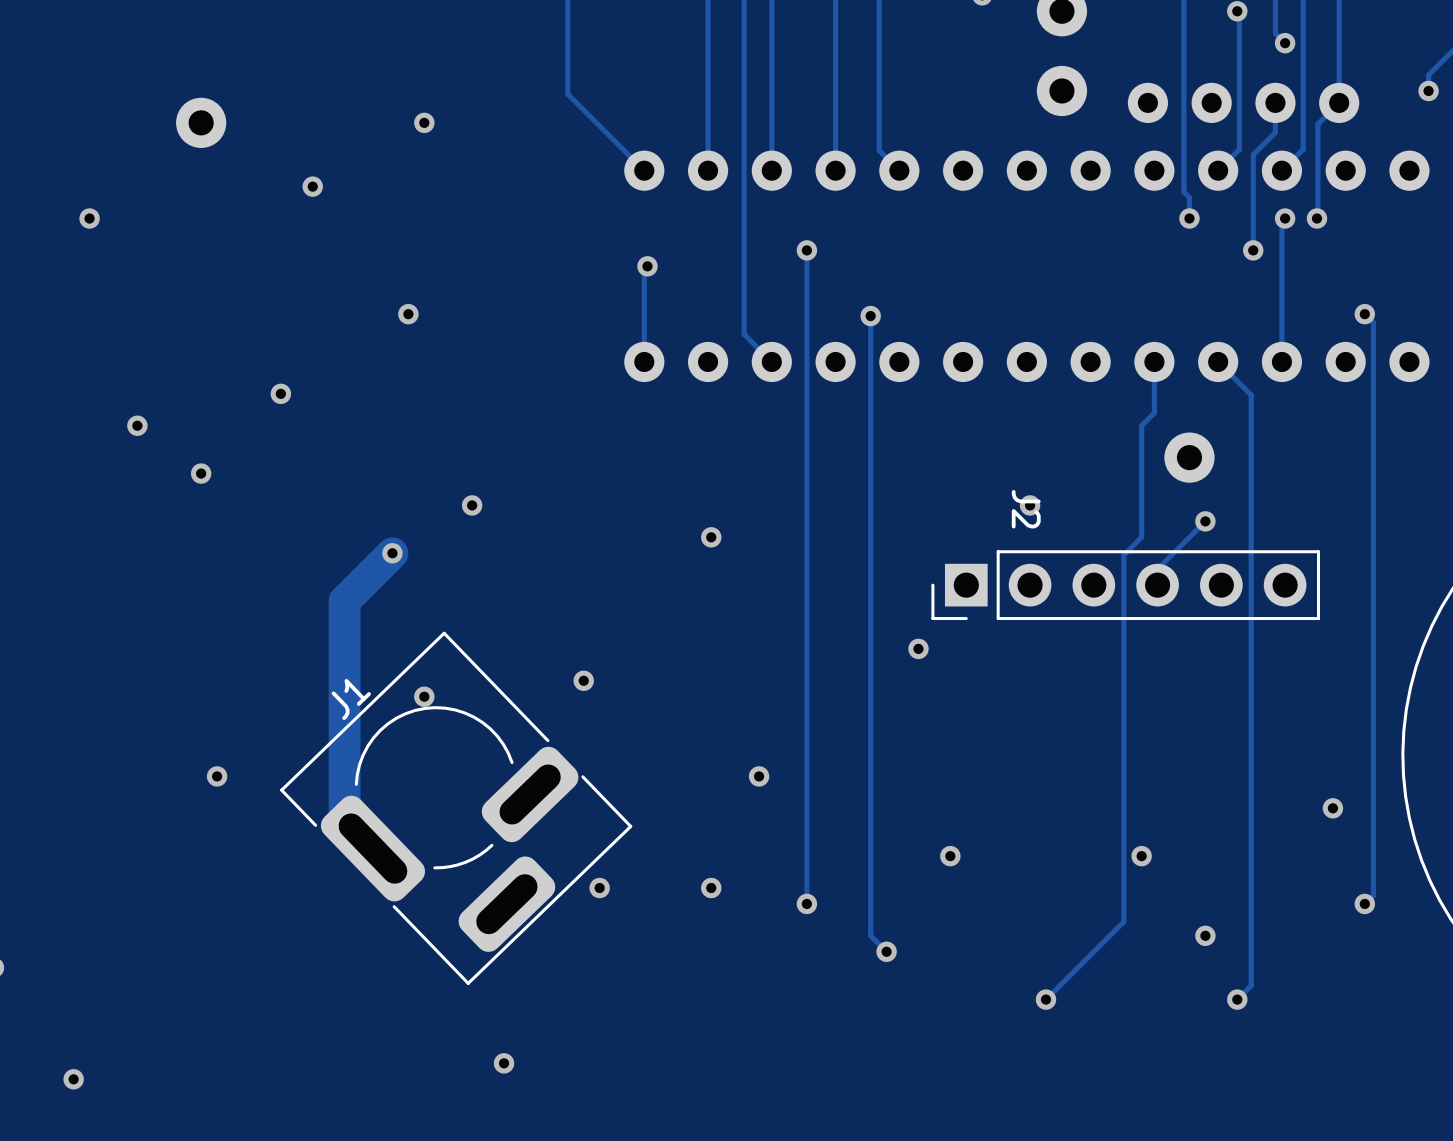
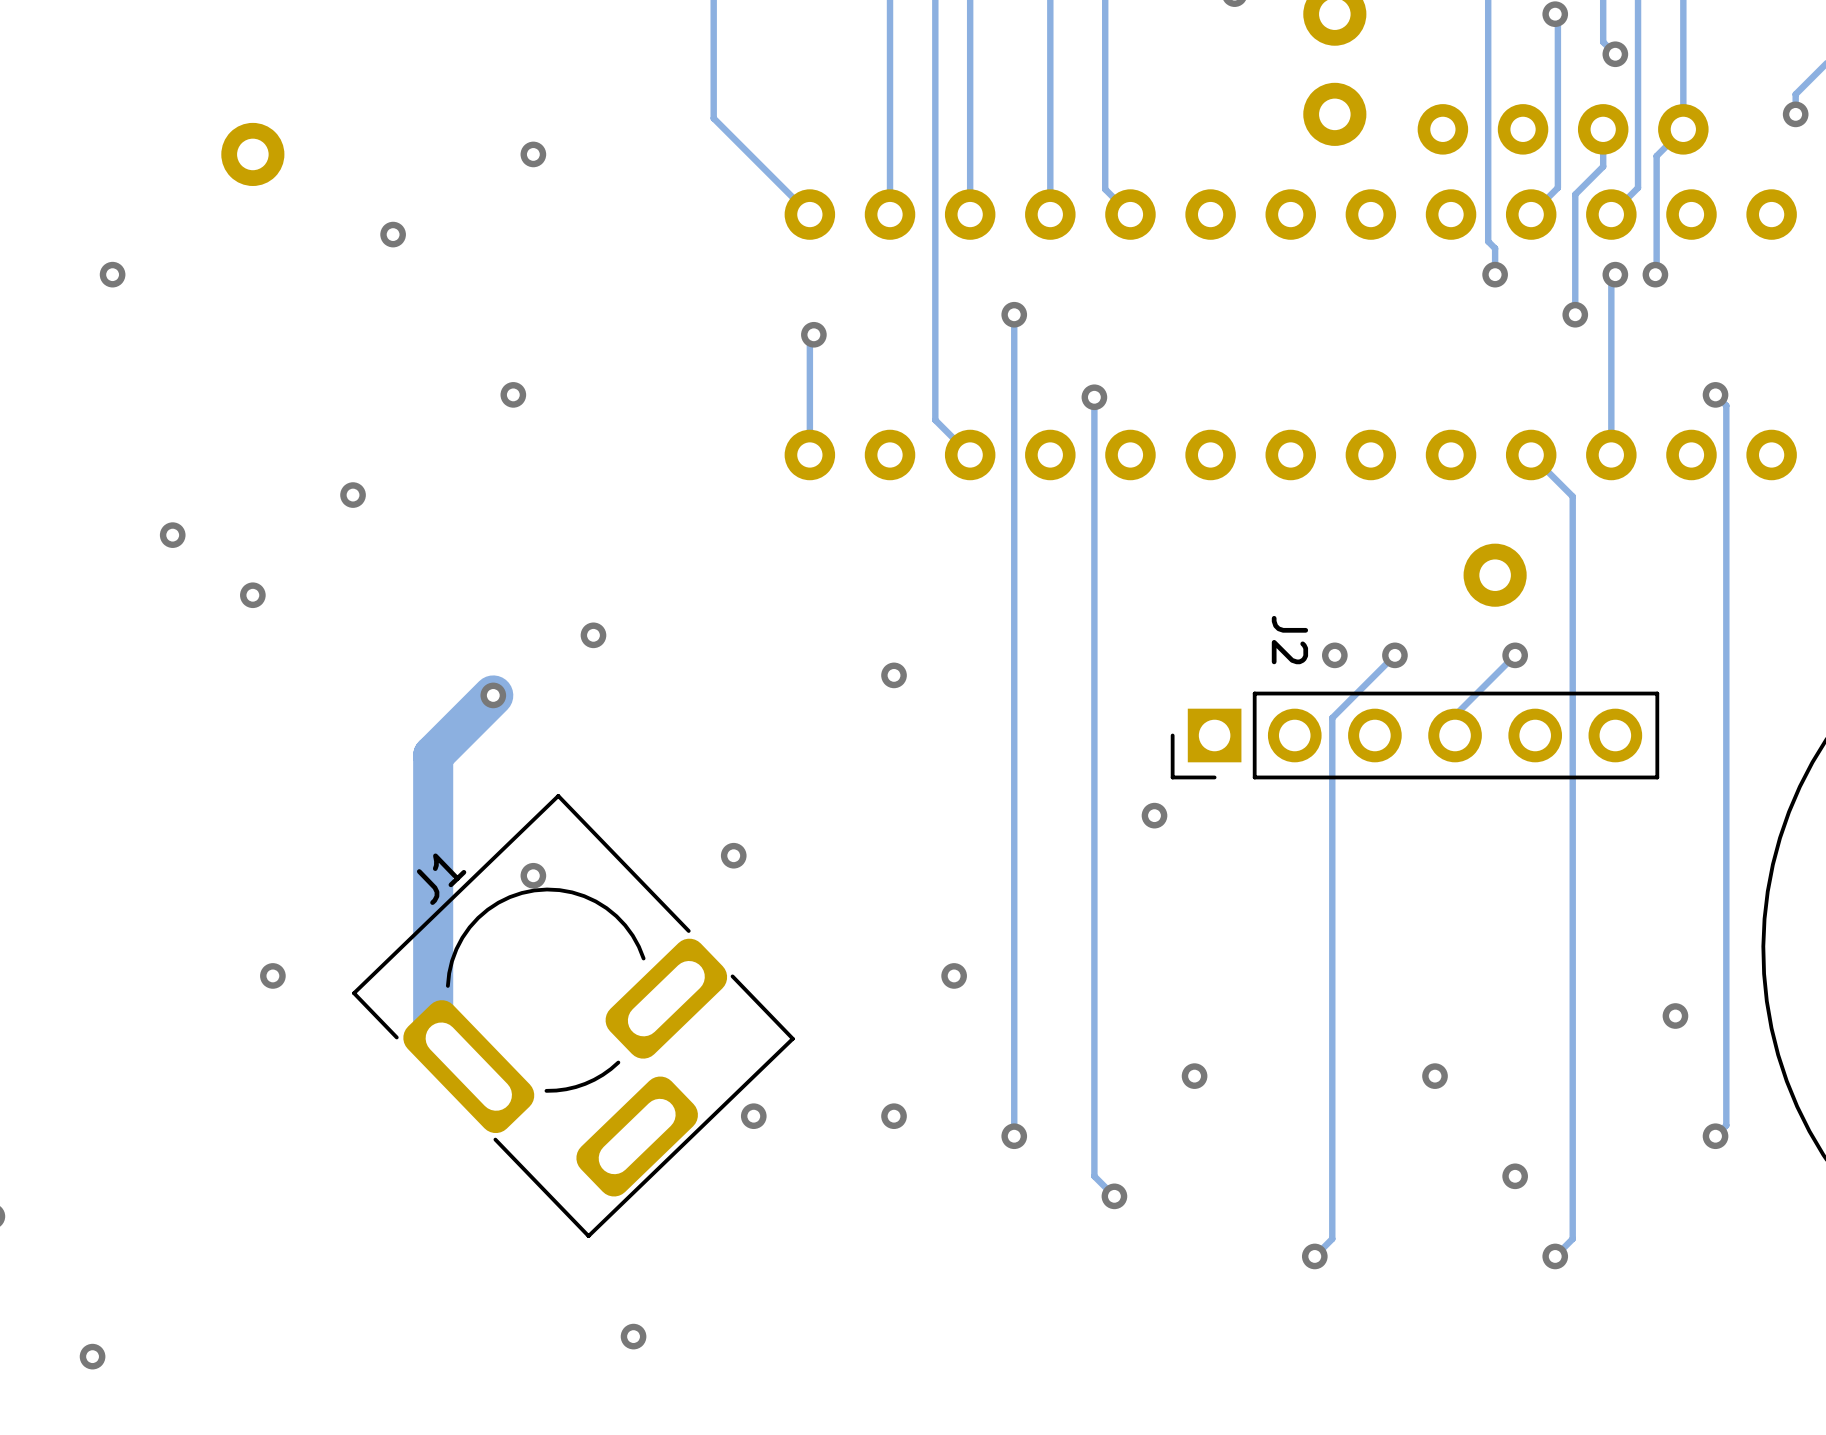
track: (1154, 361) (1154, 412) (1141, 425) (1141, 537) (1123, 555) (1123, 921) (1059, 985) -> (1394, 655) (1332, 718) (1332, 1238)
via position: (1030, 505) -> (1334, 655)
via: none -> (1394, 655)

